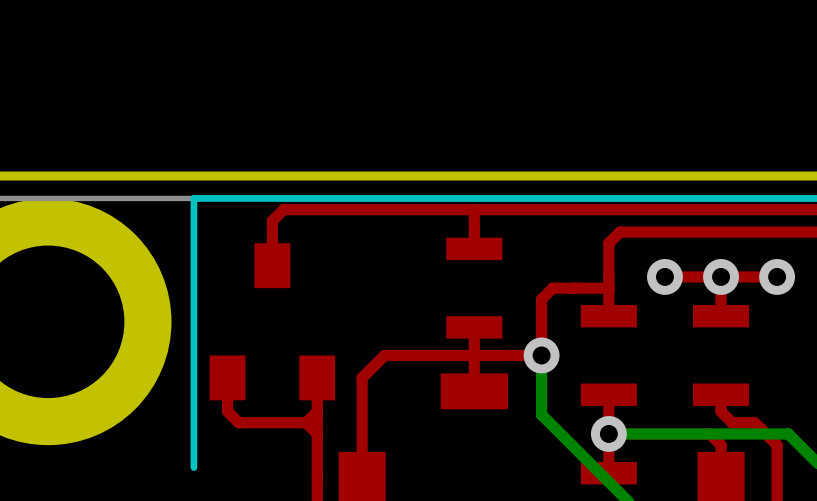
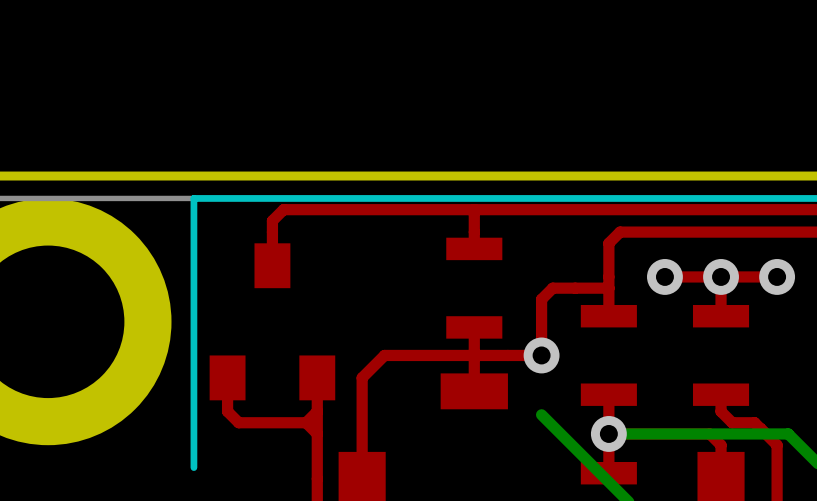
bottom track: (541, 355) (541, 414) -> none

